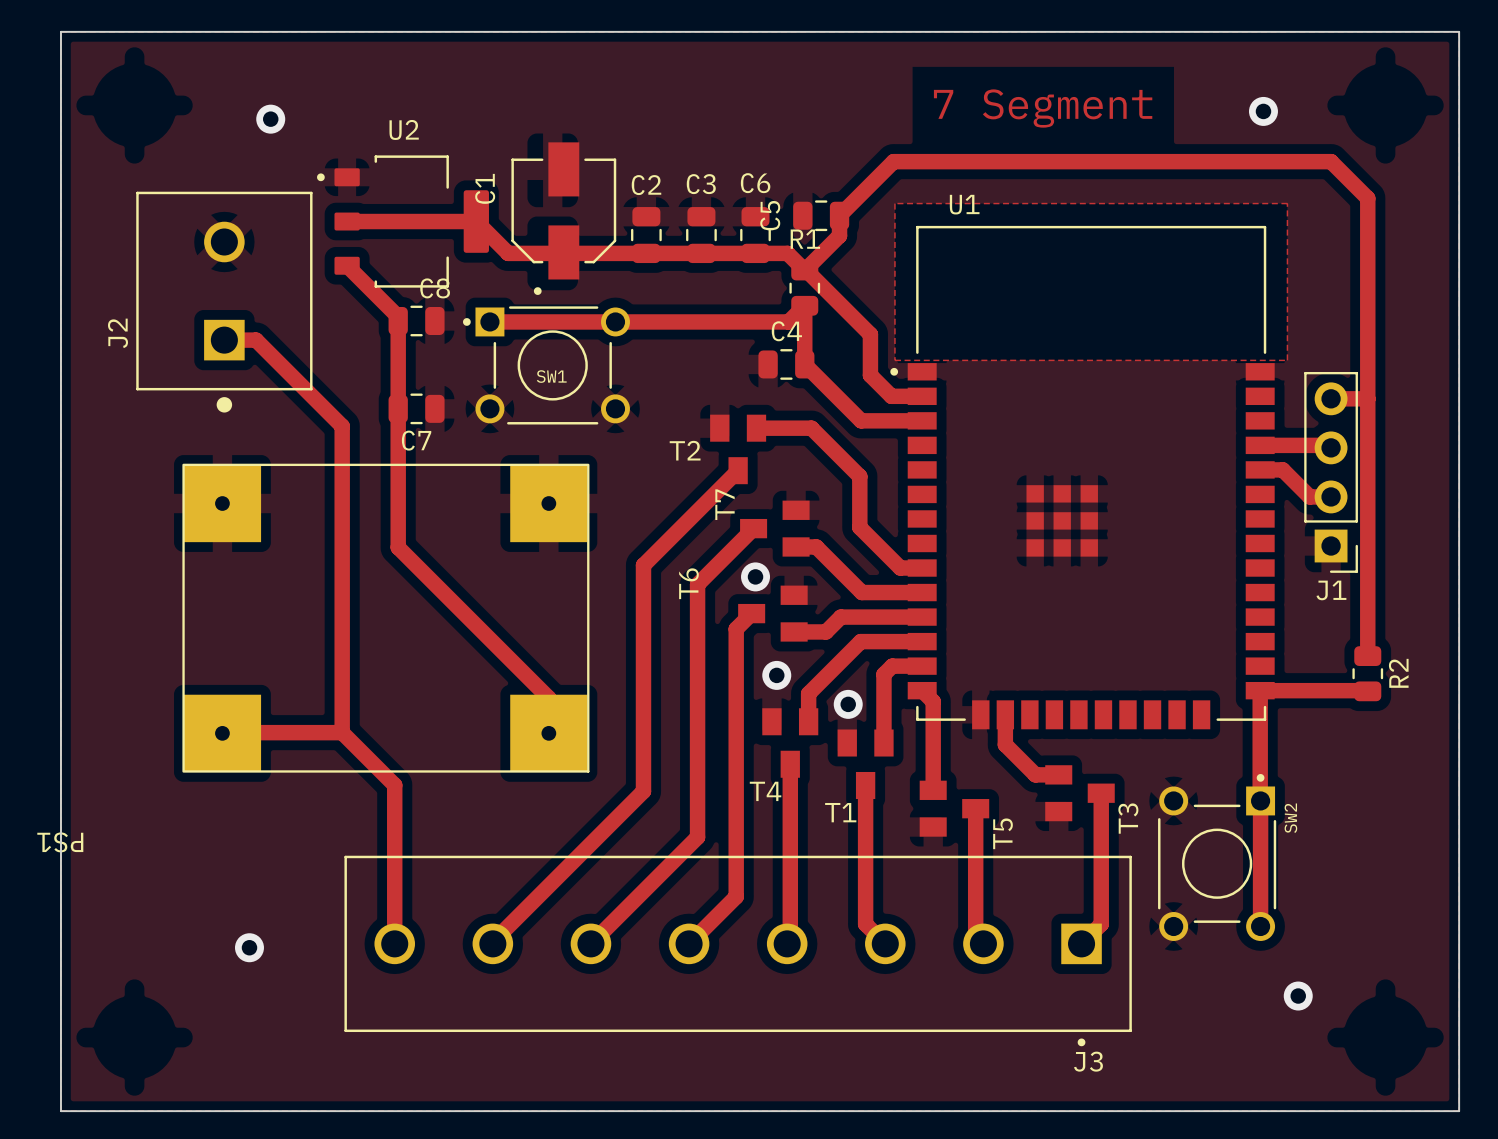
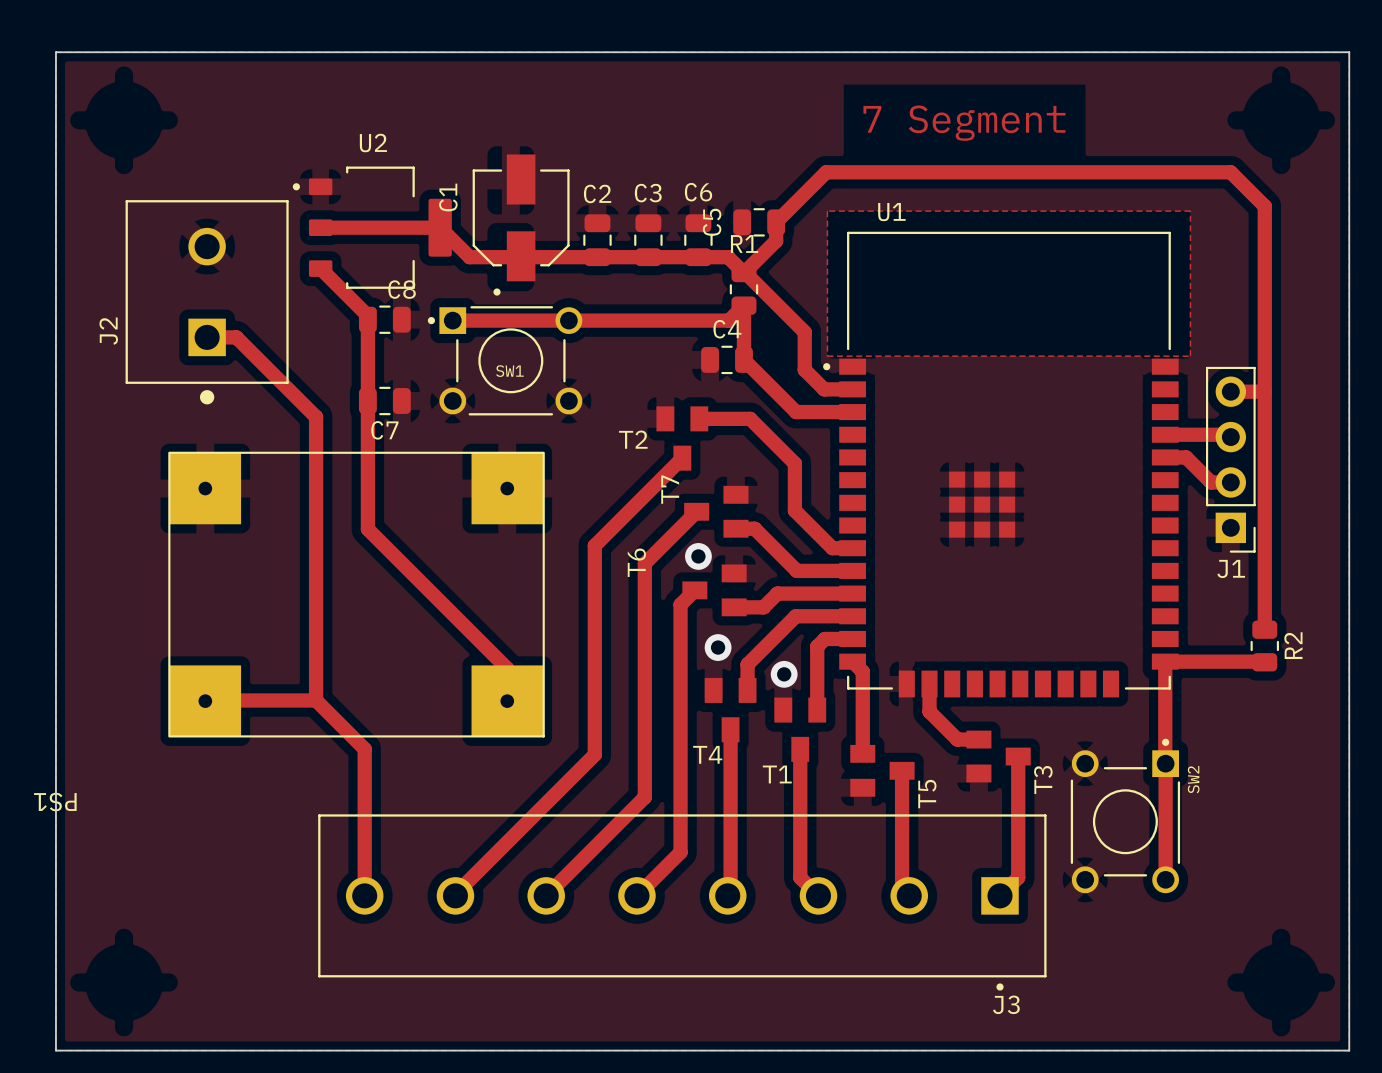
via: (1263, 111) -> none
via: (270, 119) -> none
via: (249, 947) -> none
via: (1298, 996) -> none

